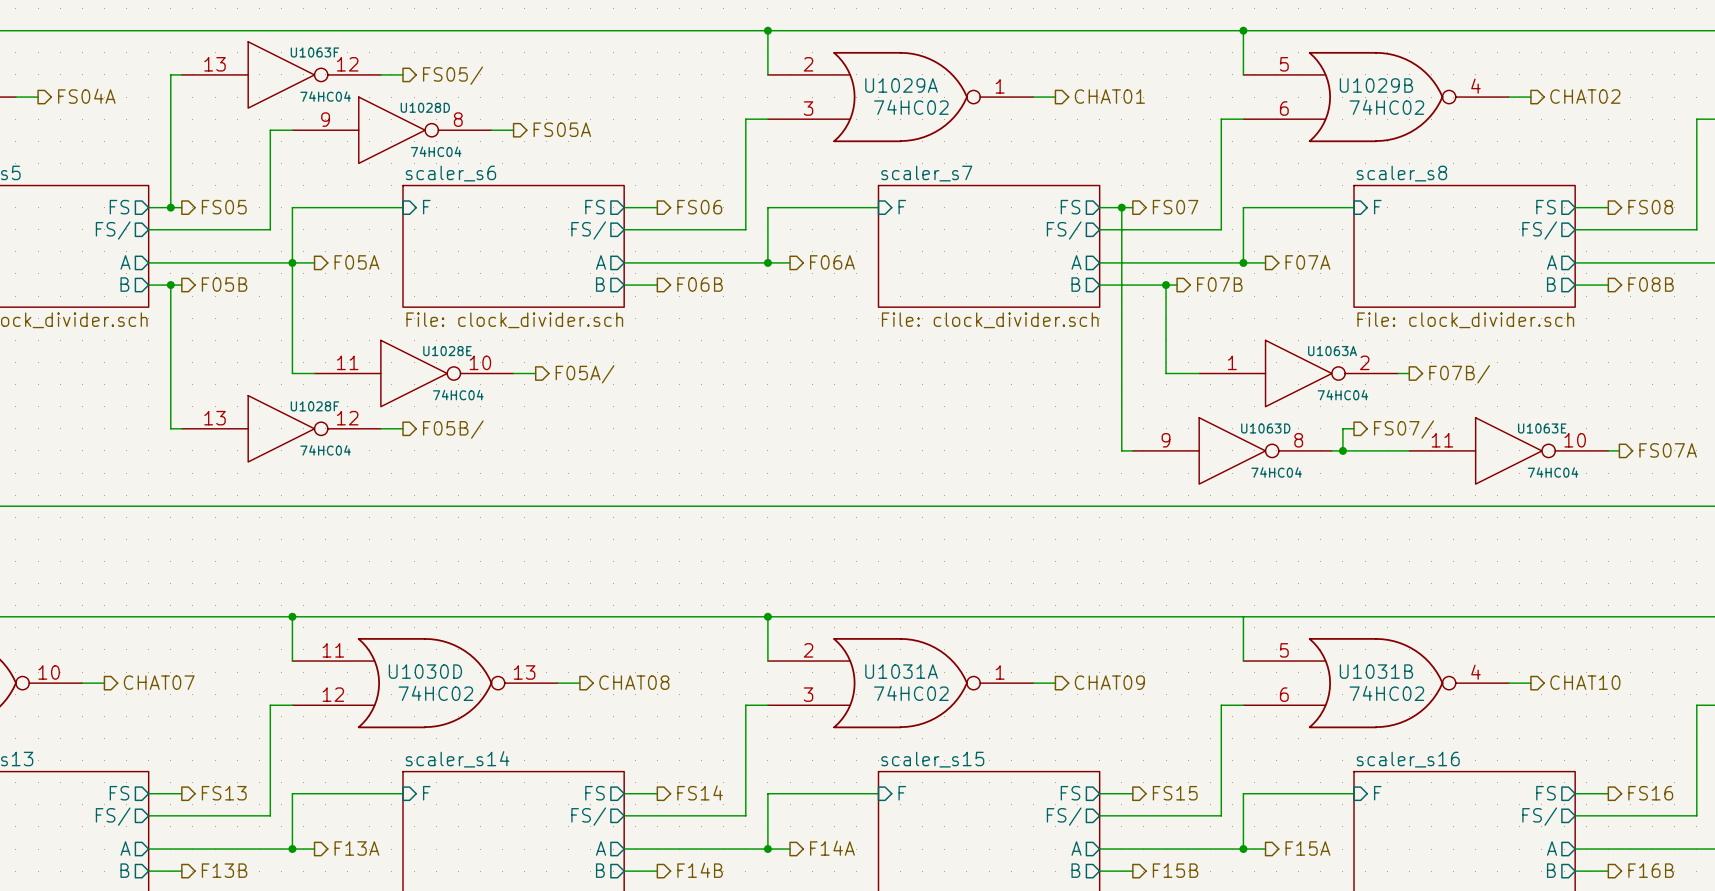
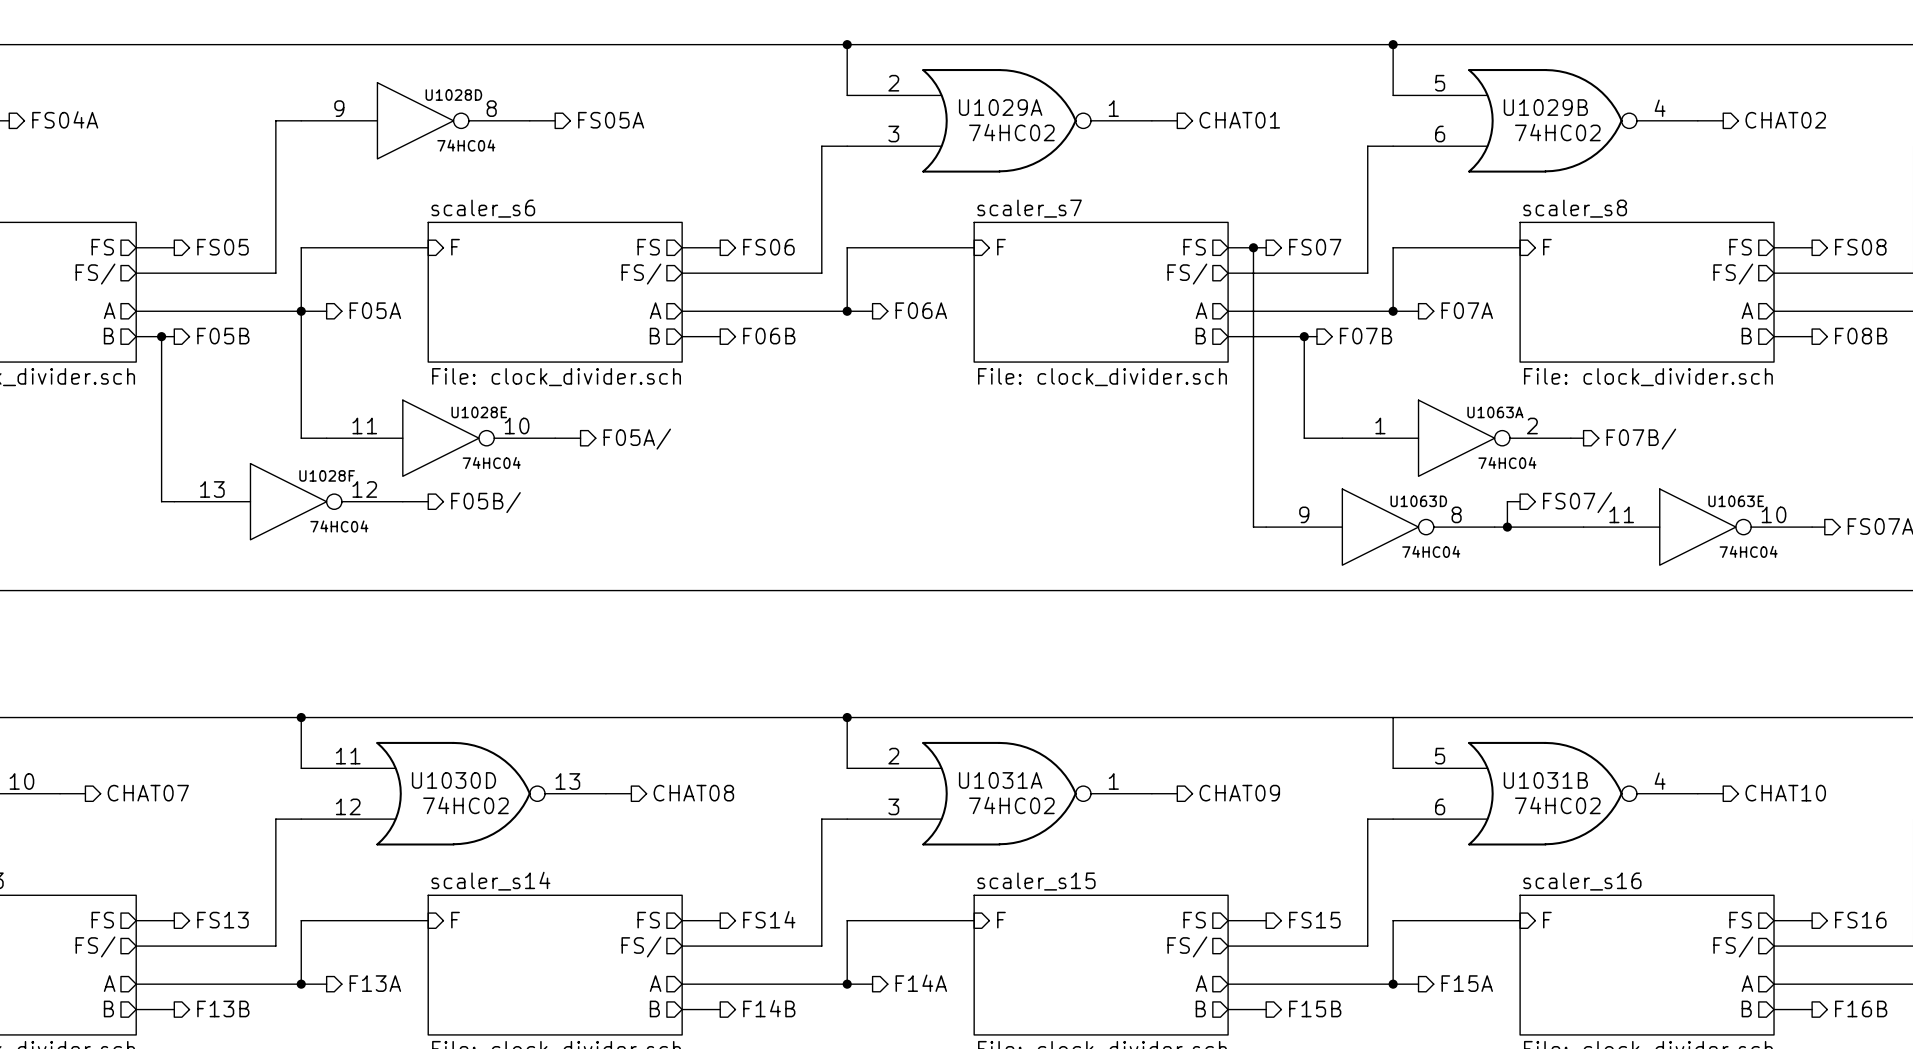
wire: (181, 74) (170, 74) (170, 207) -> none
U1063F: 74HC04 (281, 74) -> none
wire: (380, 74) (403, 74) -> none
hierarchical label: FS05/ (453, 75) -> none
hierarchical label position: FS05A (562, 129) -> FS05A (611, 120)
wire: (270, 130) (292, 130) -> (275, 158) (275, 120) (301, 120)
U1028D position: (391, 130) -> (415, 120)
wire: (491, 130) (513, 130) -> (529, 120) (555, 120)
junction: (170, 207) -> none

